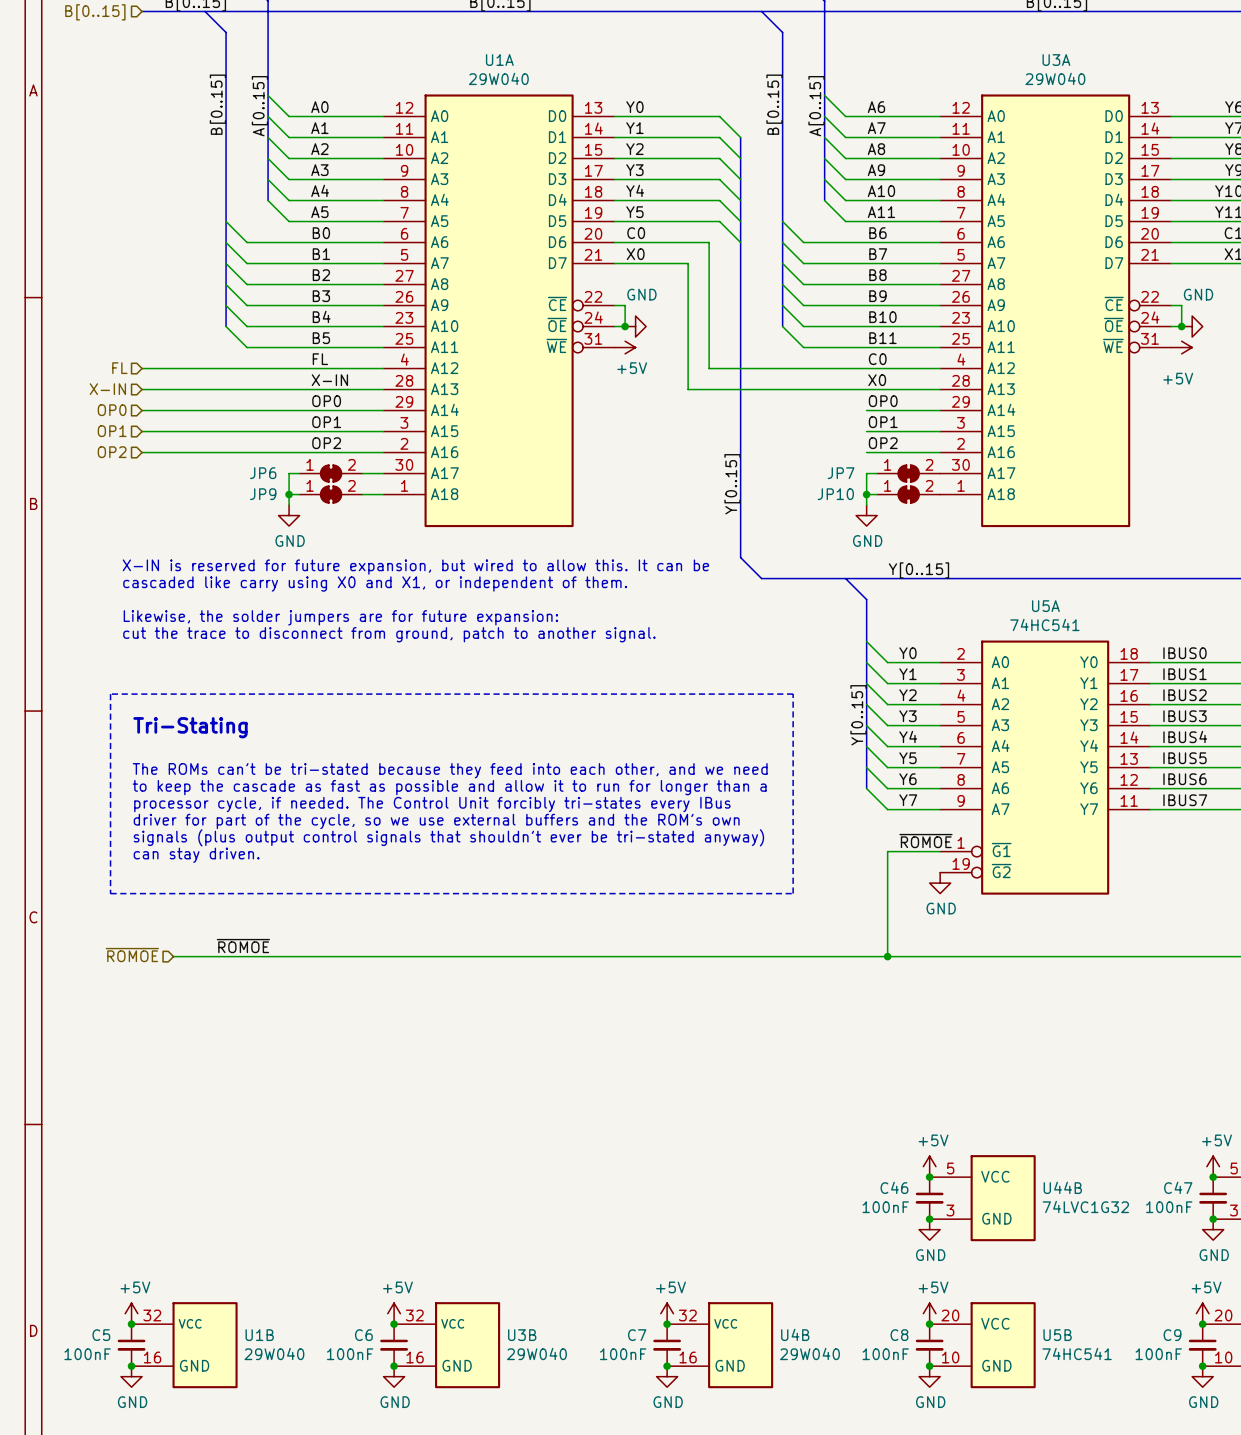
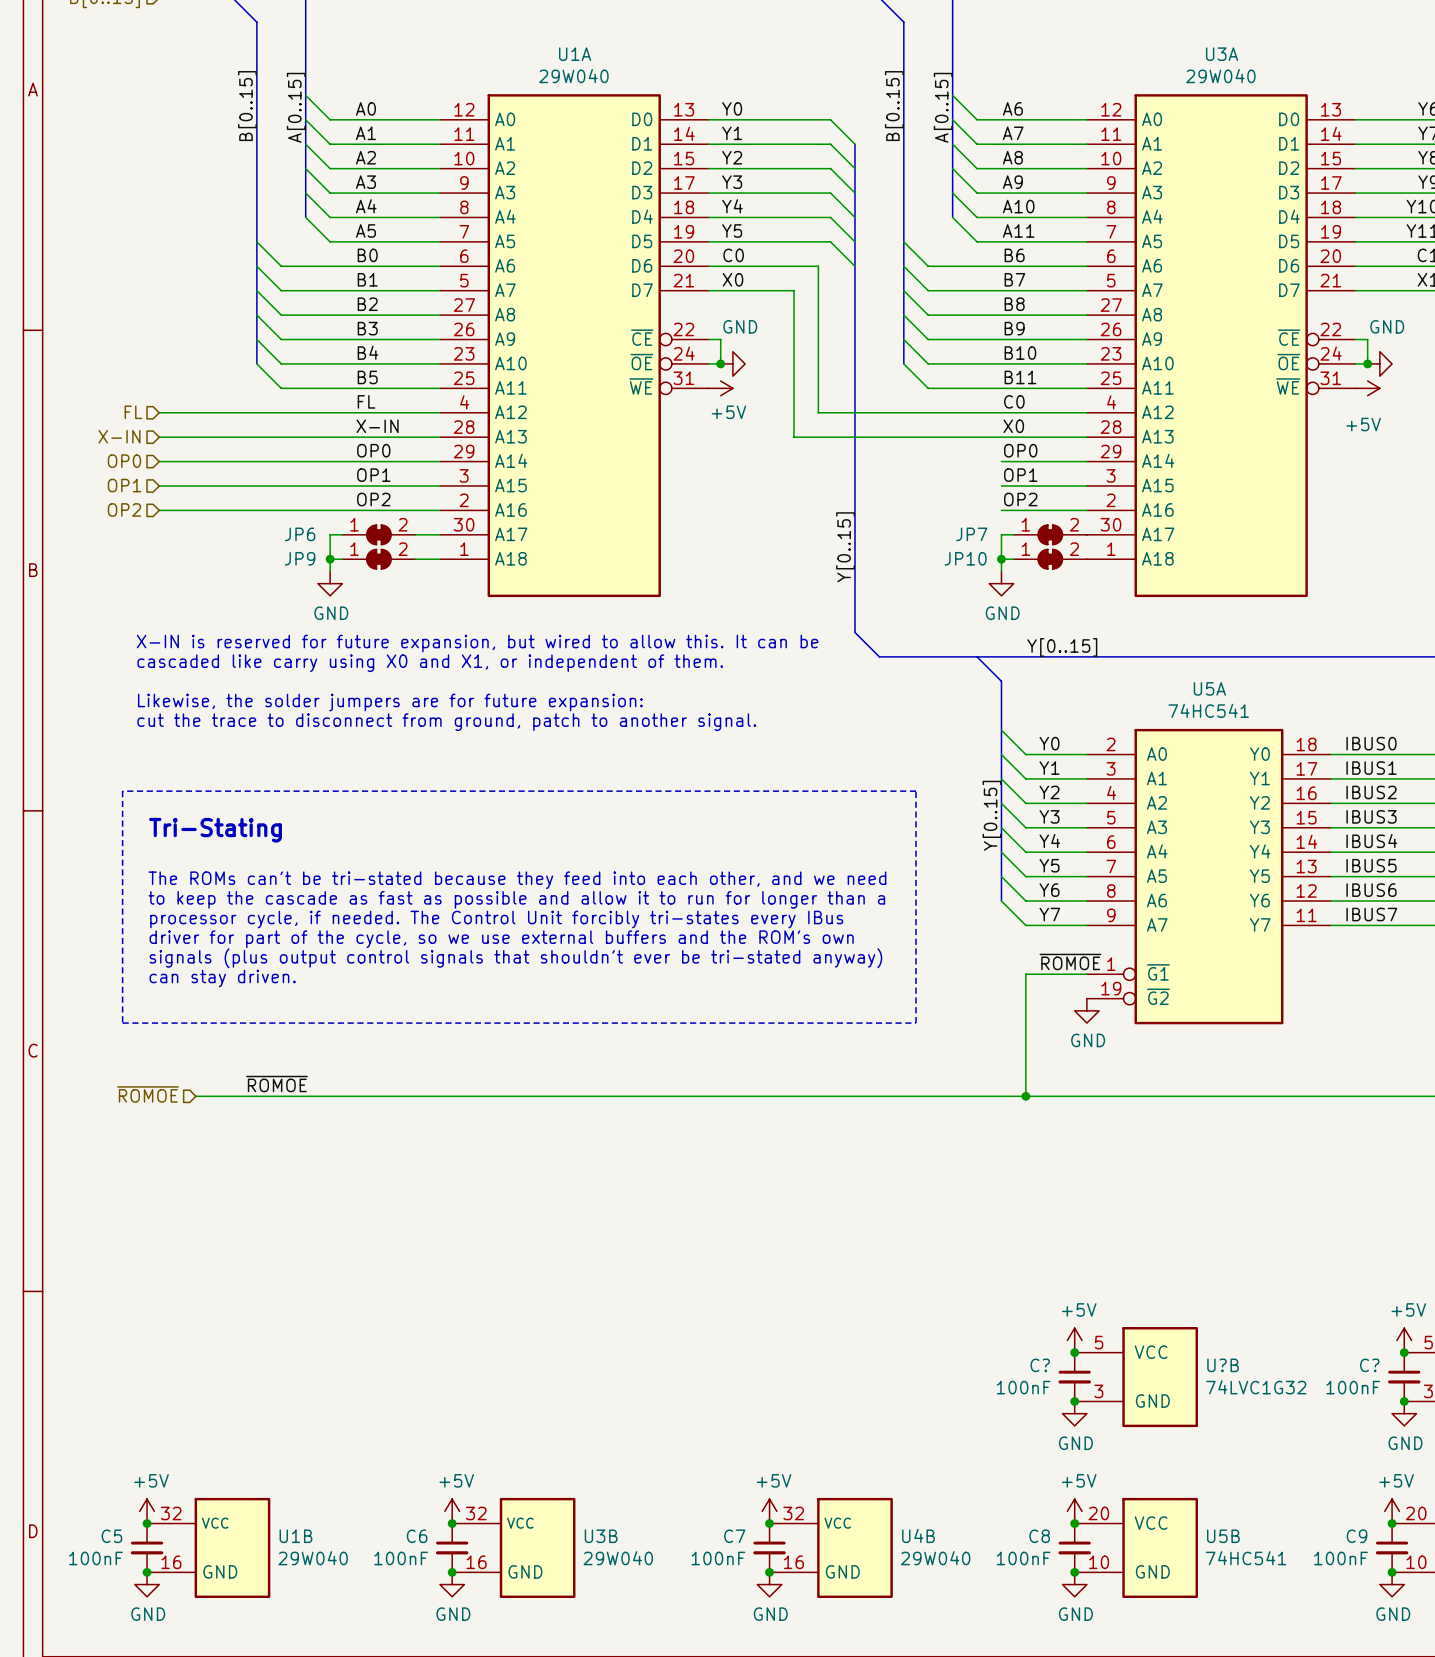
C46 name: C46 (894, 1187) -> C? (1040, 1365)
U44B name: U44B (1062, 1187) -> U?B (1223, 1365)
C47 name: C47 (1178, 1187) -> C? (1369, 1365)

